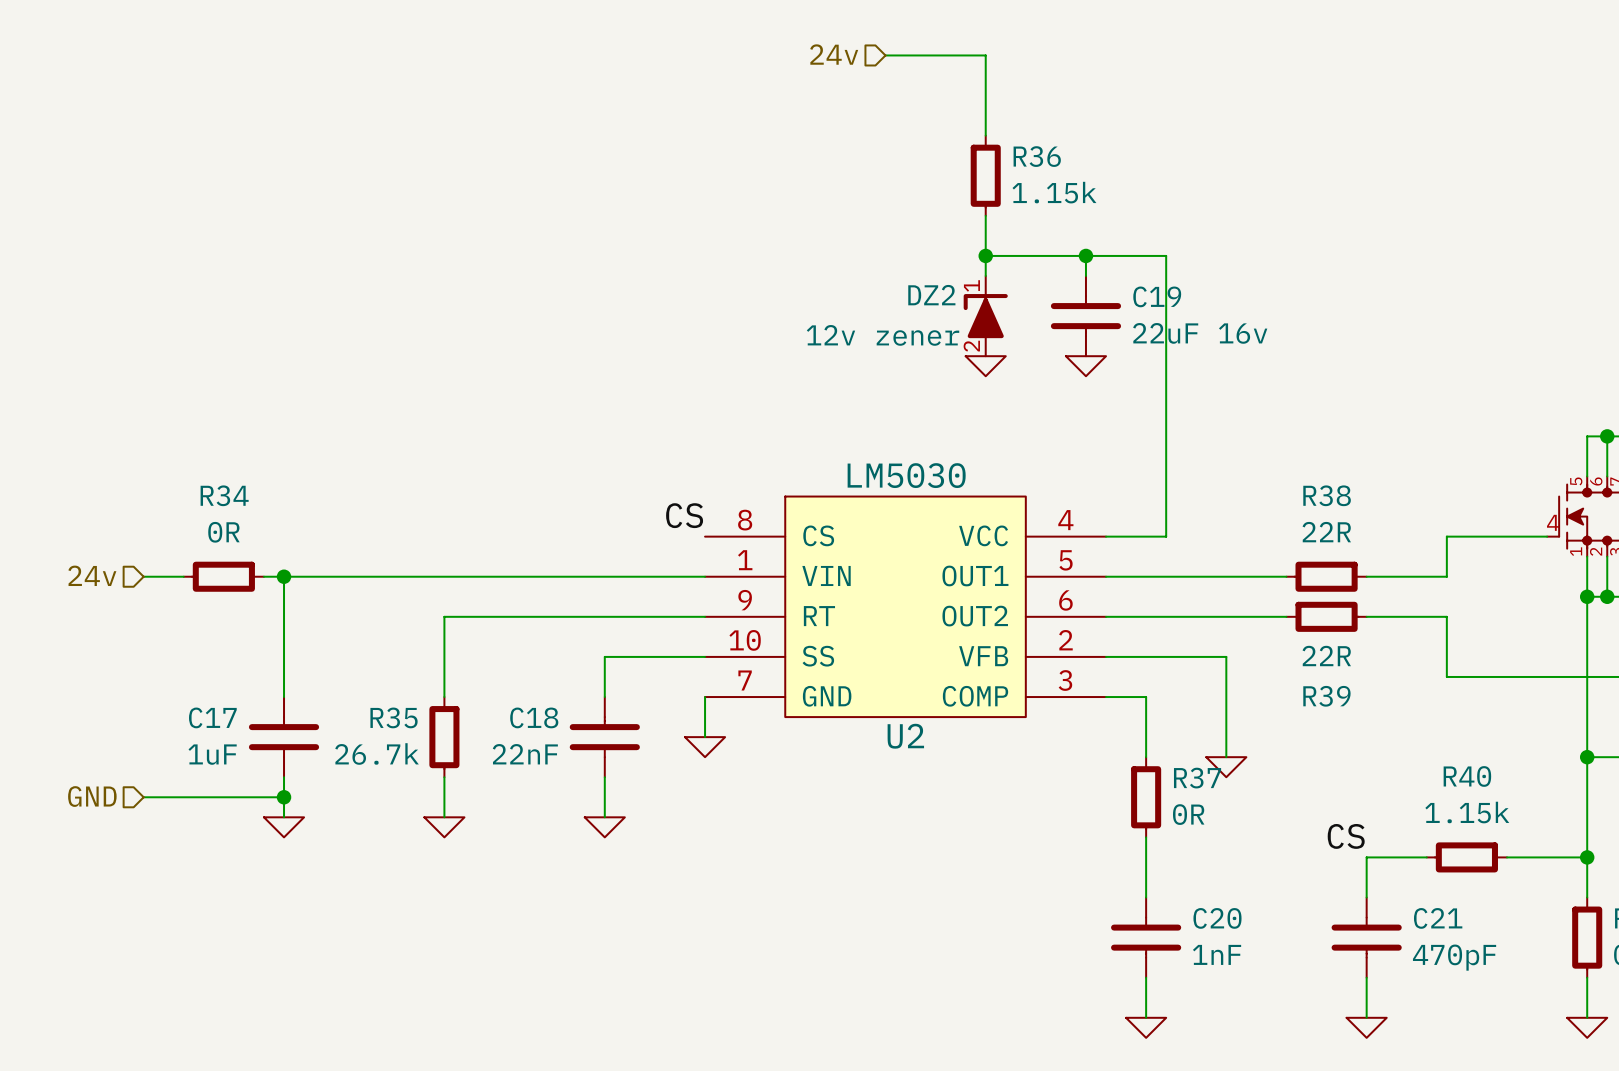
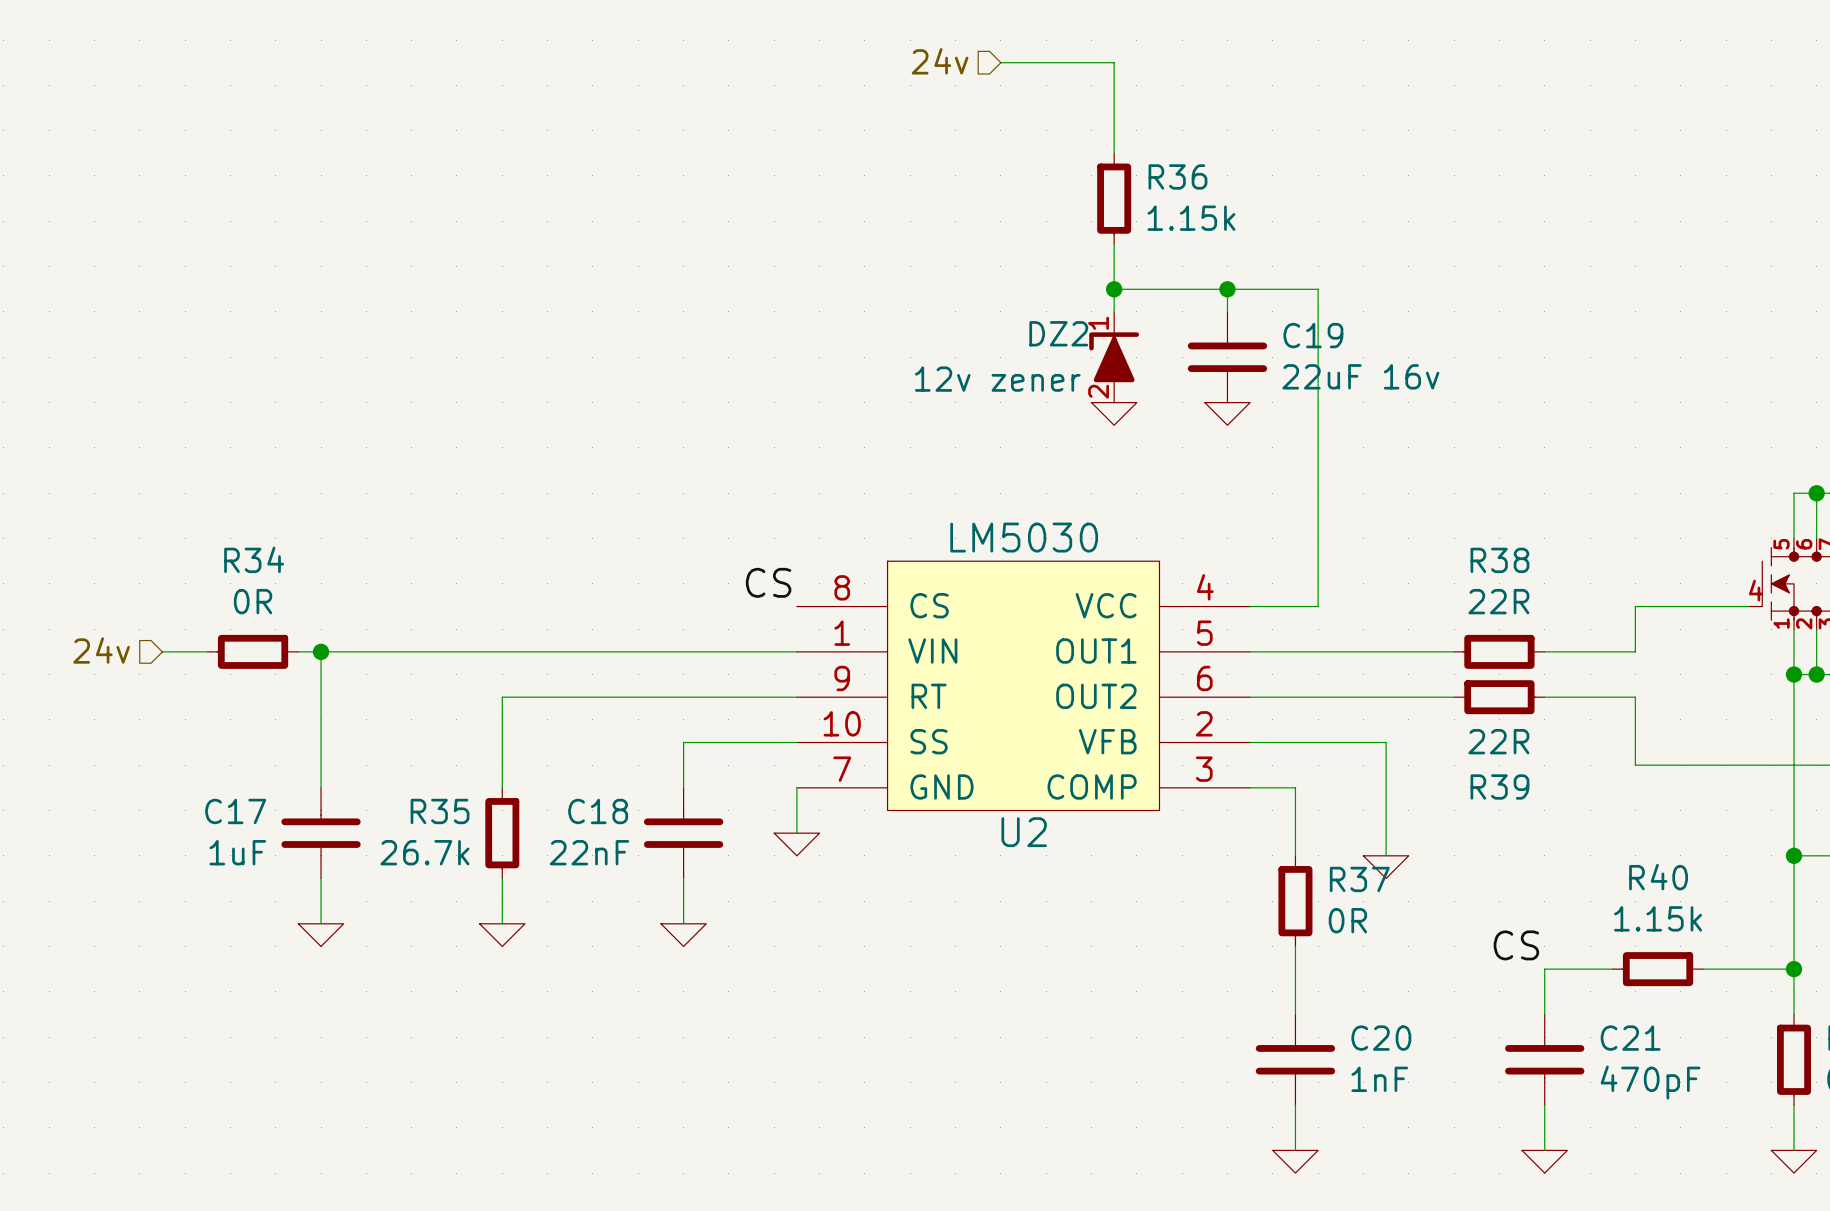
hierarchical label: GND (92, 796) -> none
wire: (143, 797) (284, 797) -> none
junction: (284, 797) -> none

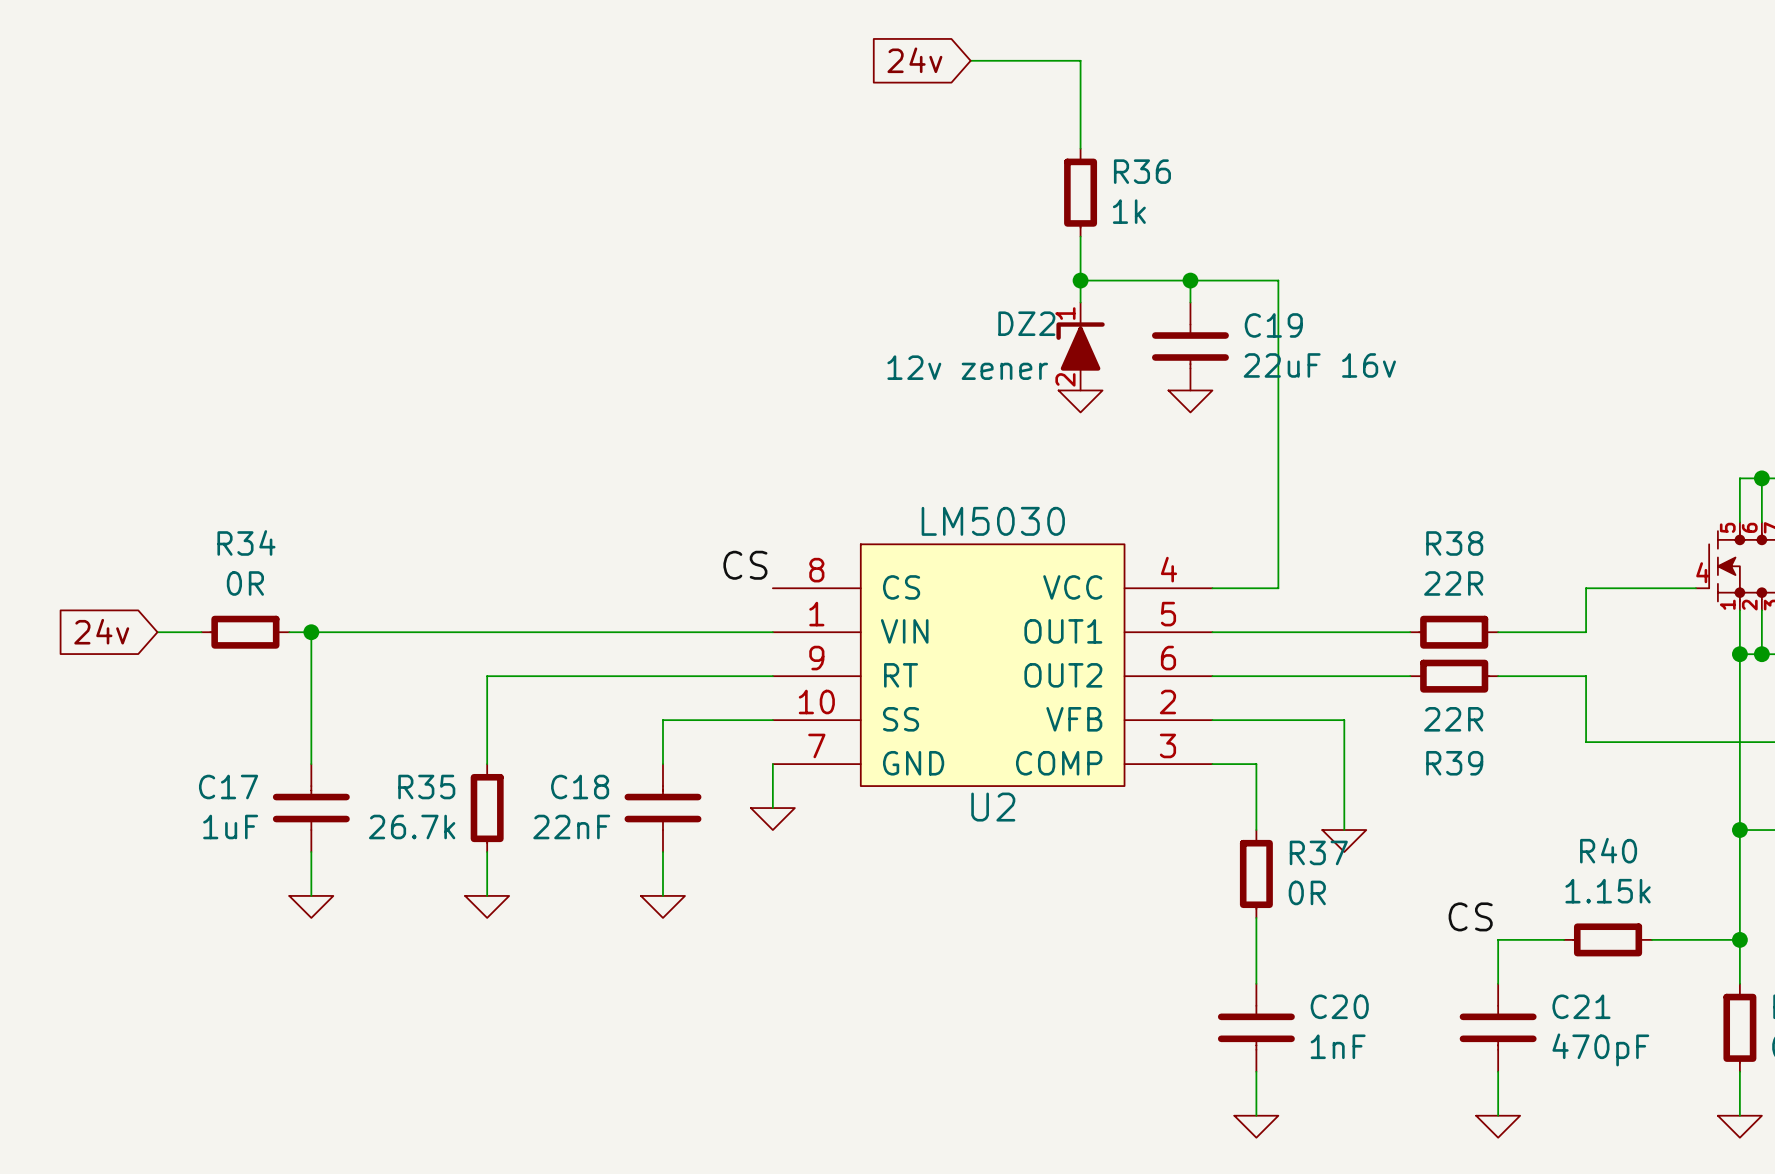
hierarchical label: 24v (940, 61) -> none
global label: none -> 24v (914, 60)
R36 value: 1.15k (1191, 218) -> 1k (1129, 211)
hierarchical label: 24v (101, 650) -> none
global label: none -> 24v (101, 631)

